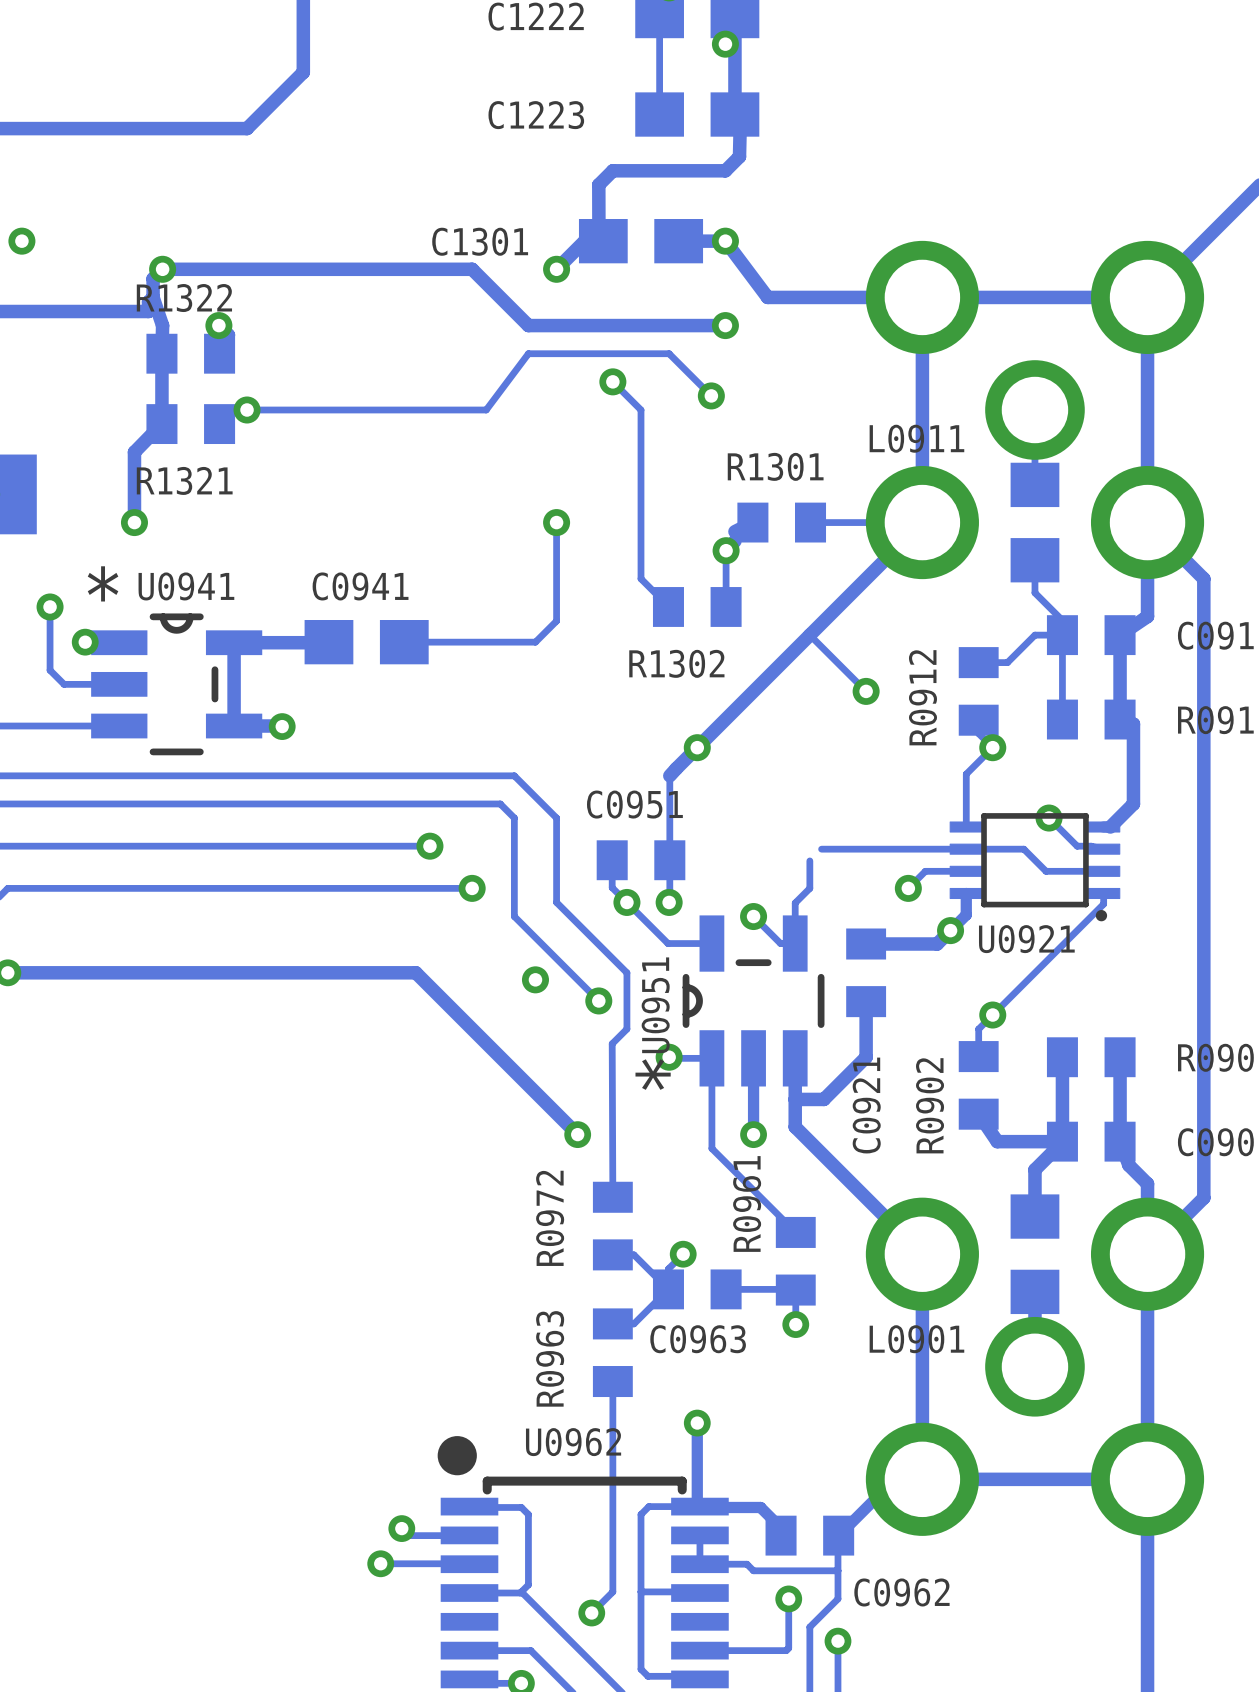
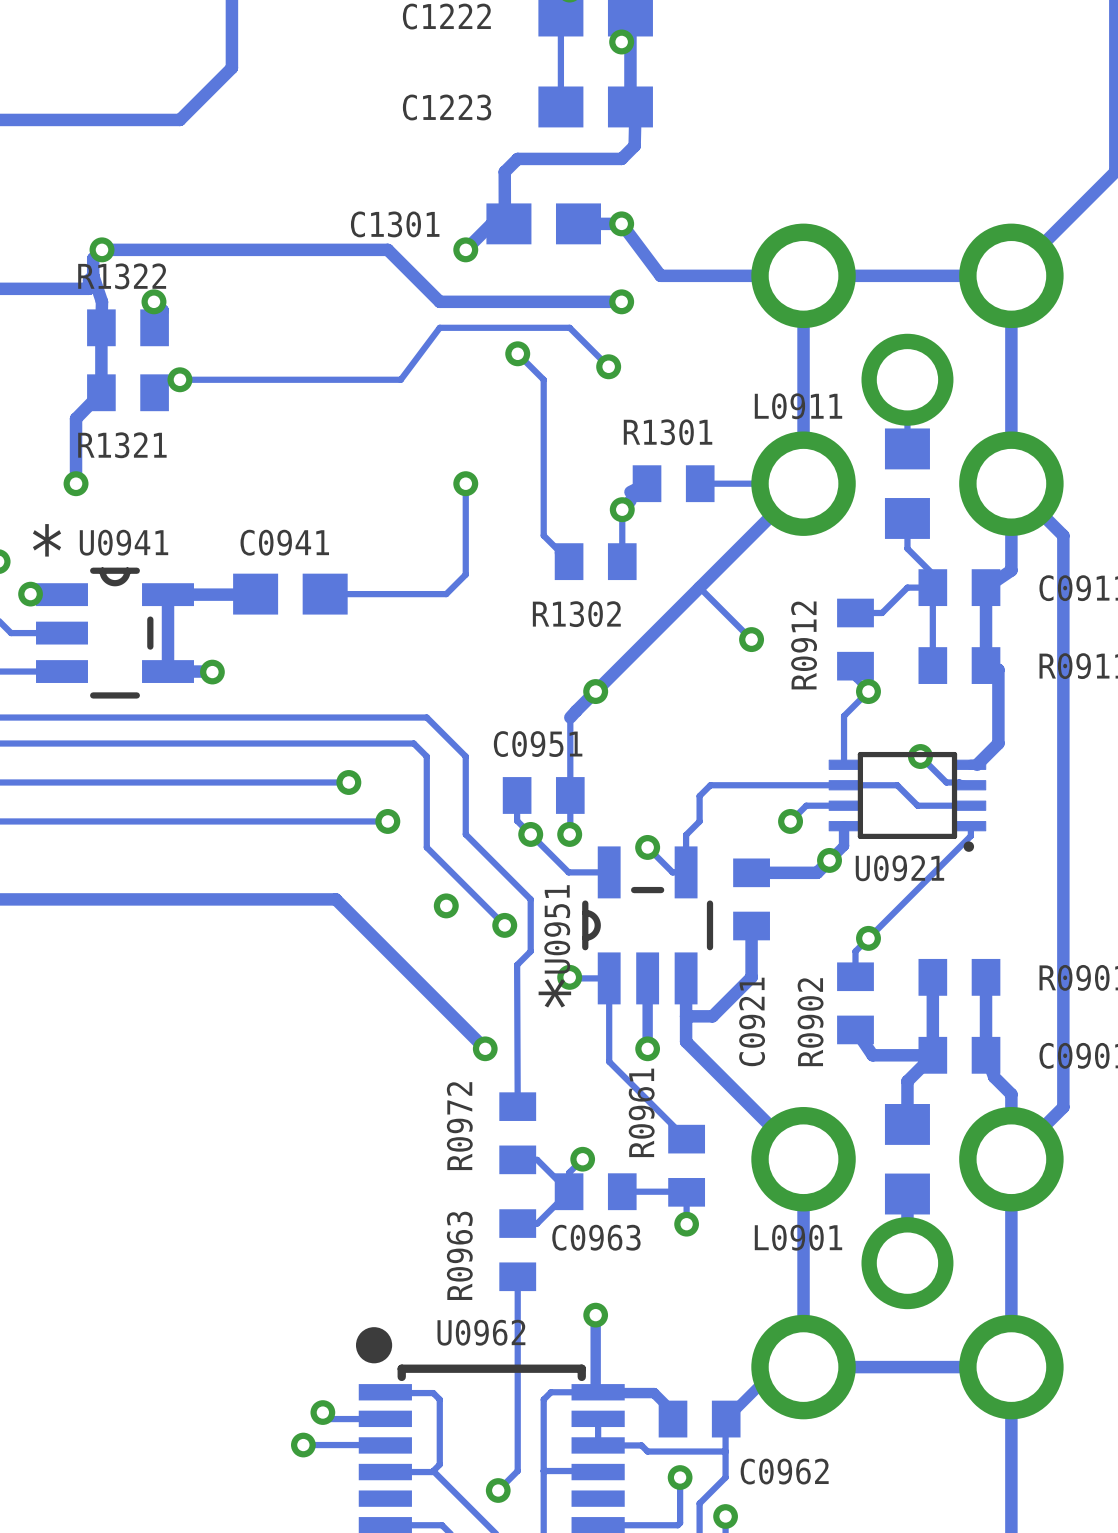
track: none -> (710, 785) (699, 796)

